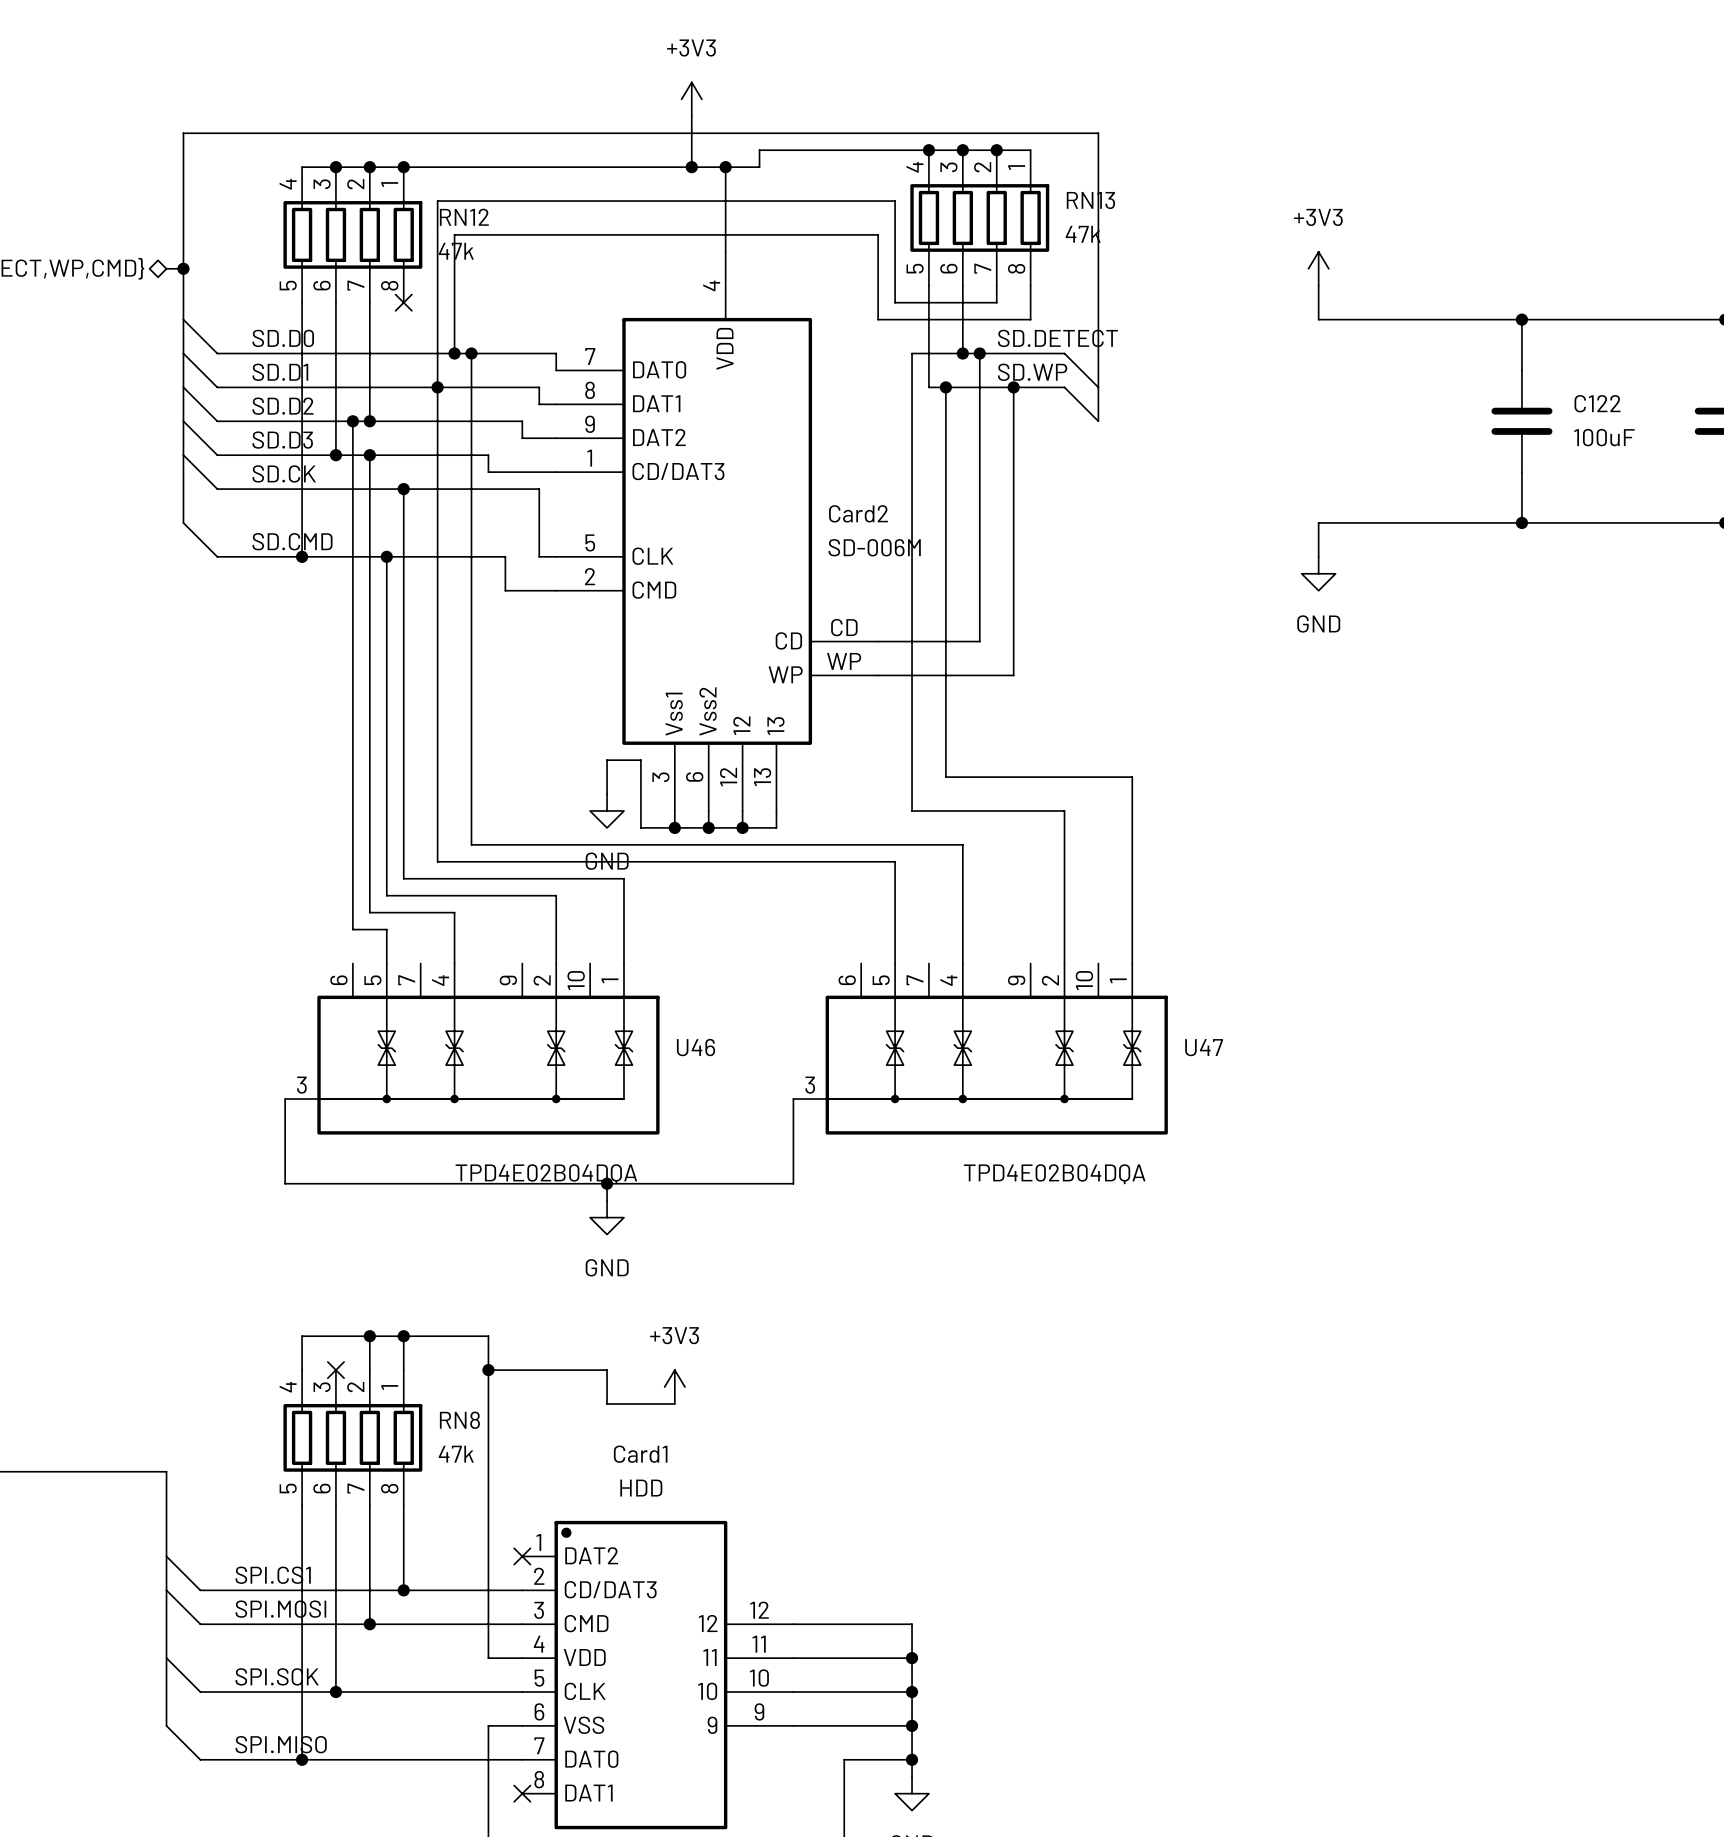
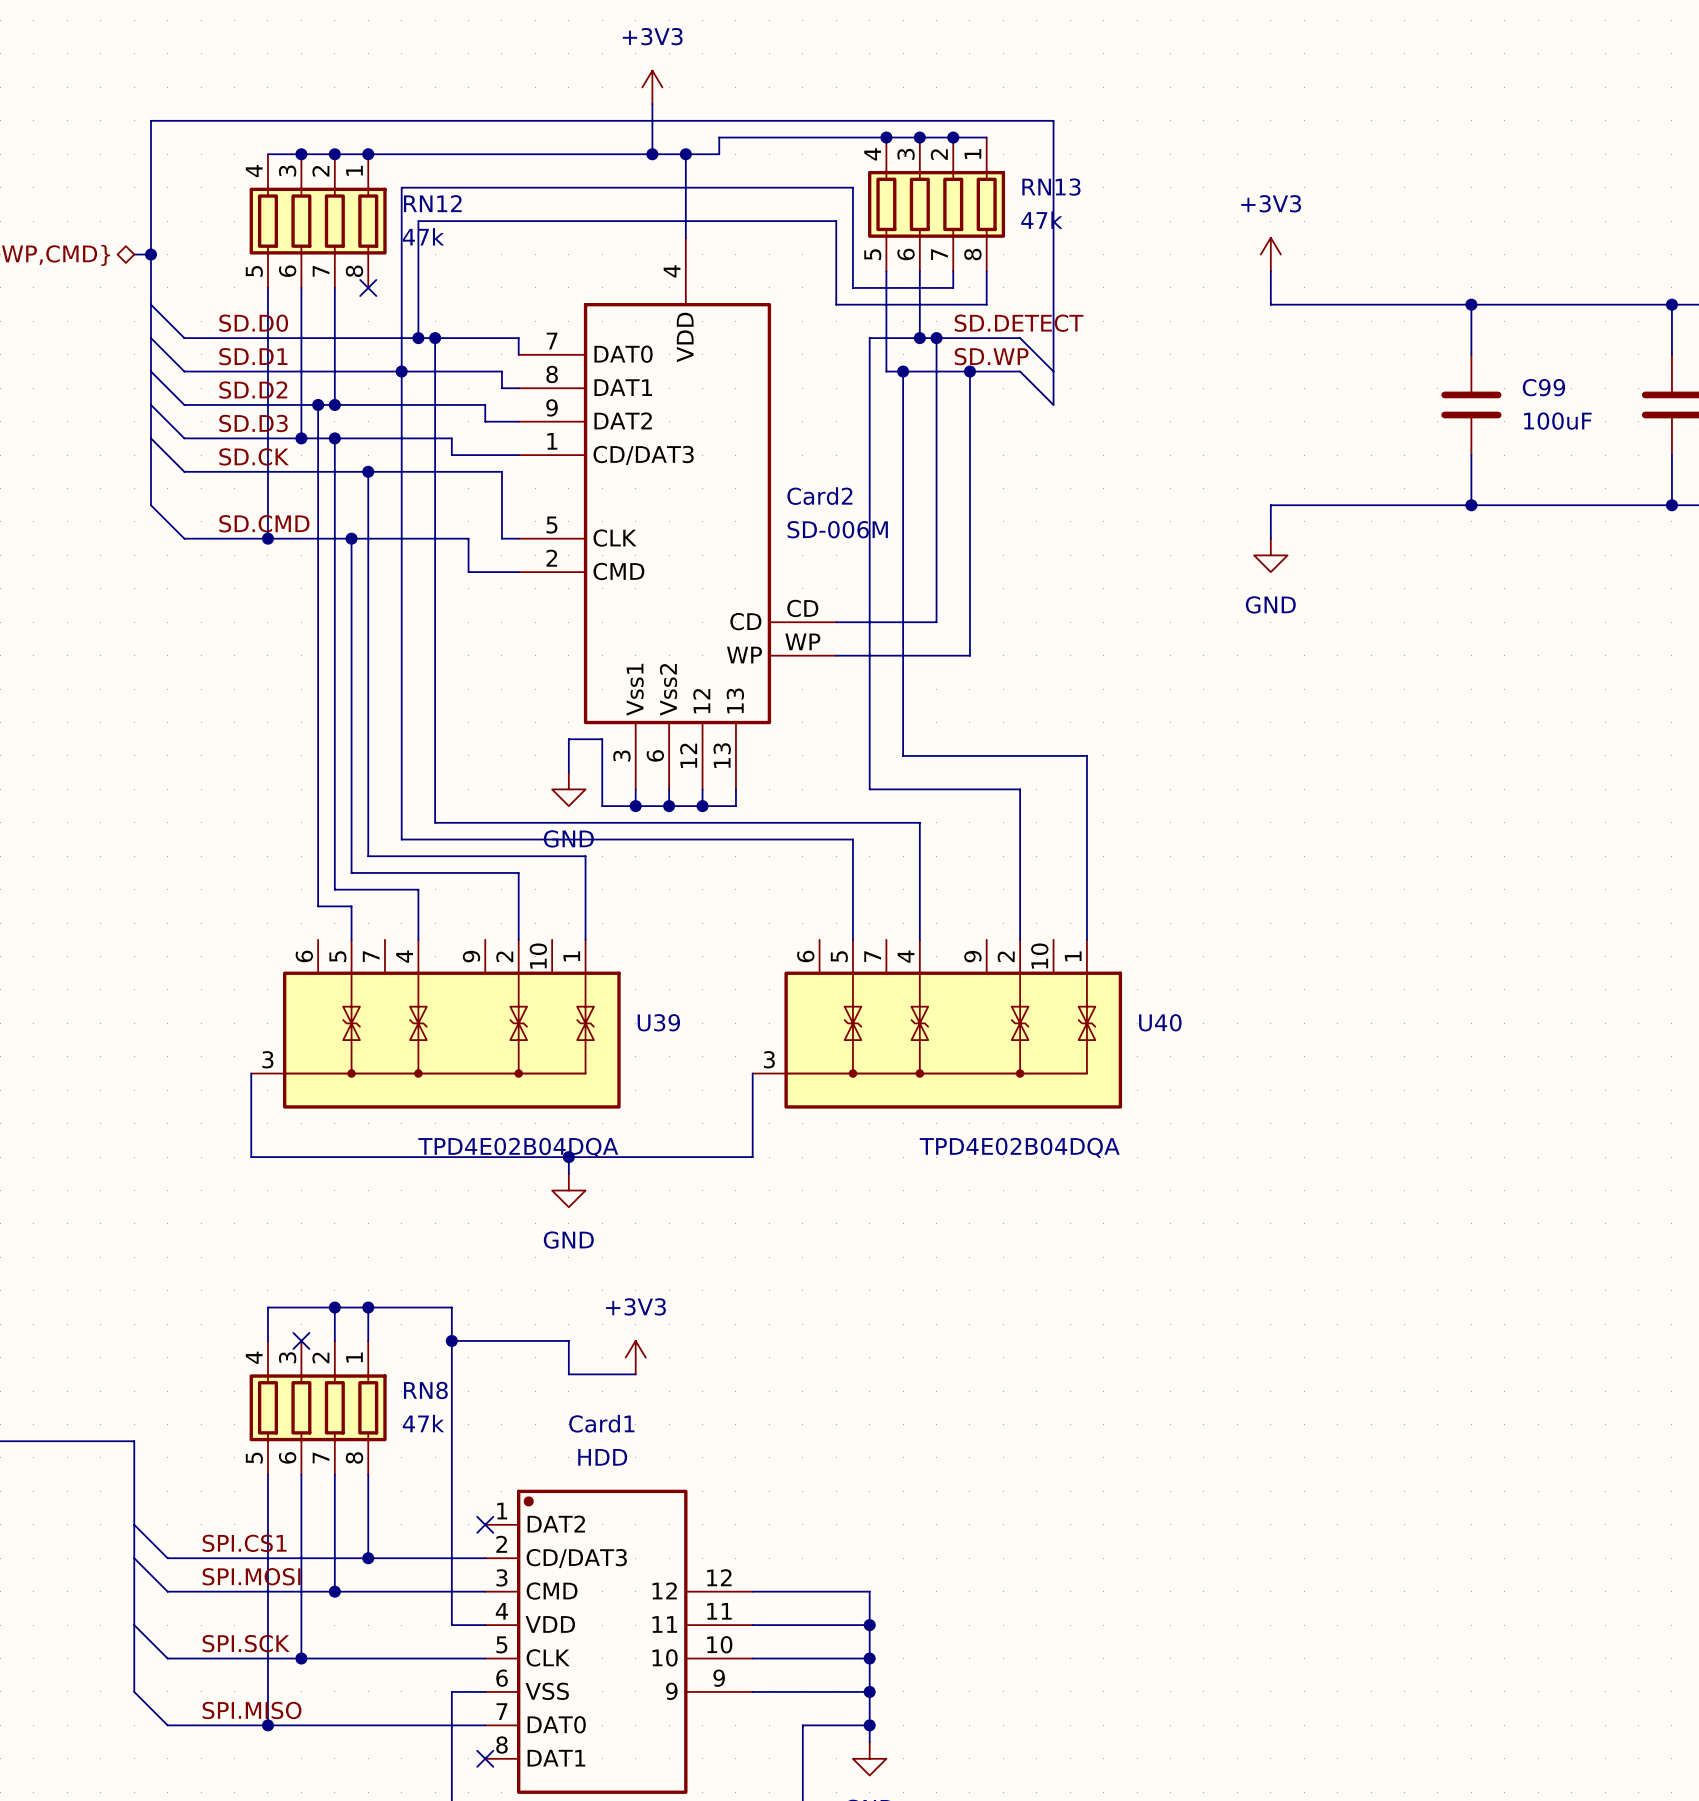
C122 name: C122 (1597, 403) -> C99 (1543, 387)
U46 name: U46 (695, 1047) -> U39 (658, 1022)
U47 name: U47 (1204, 1047) -> U40 (1160, 1022)

